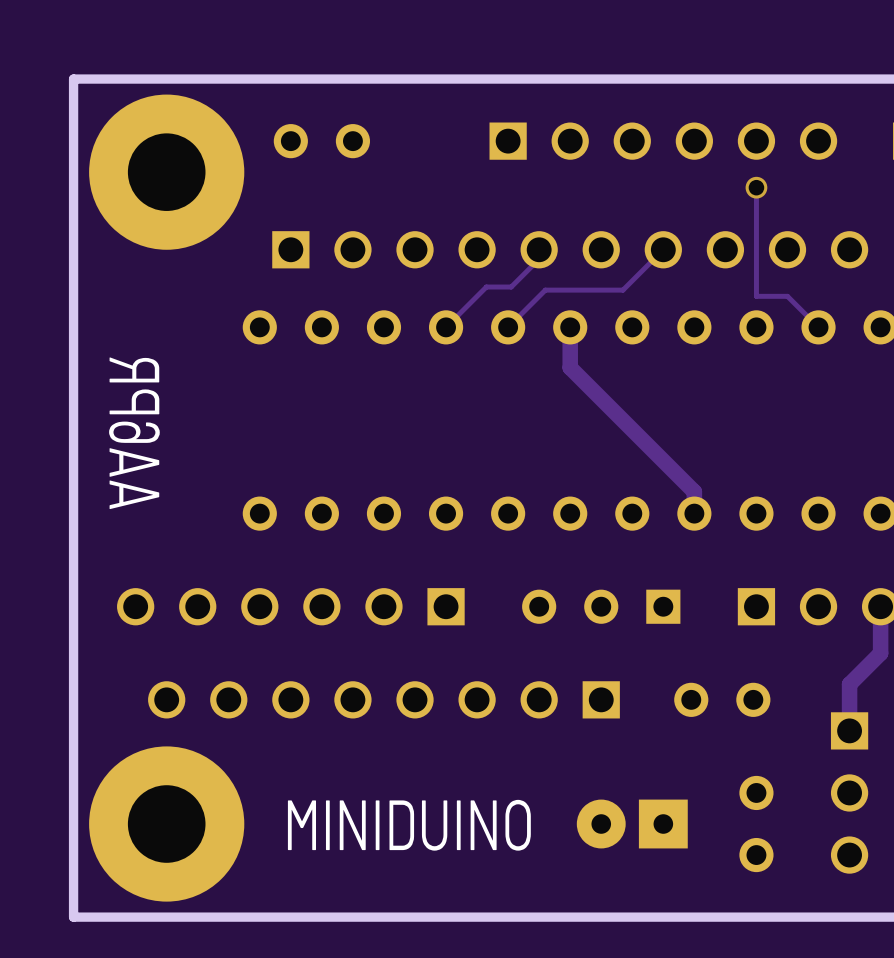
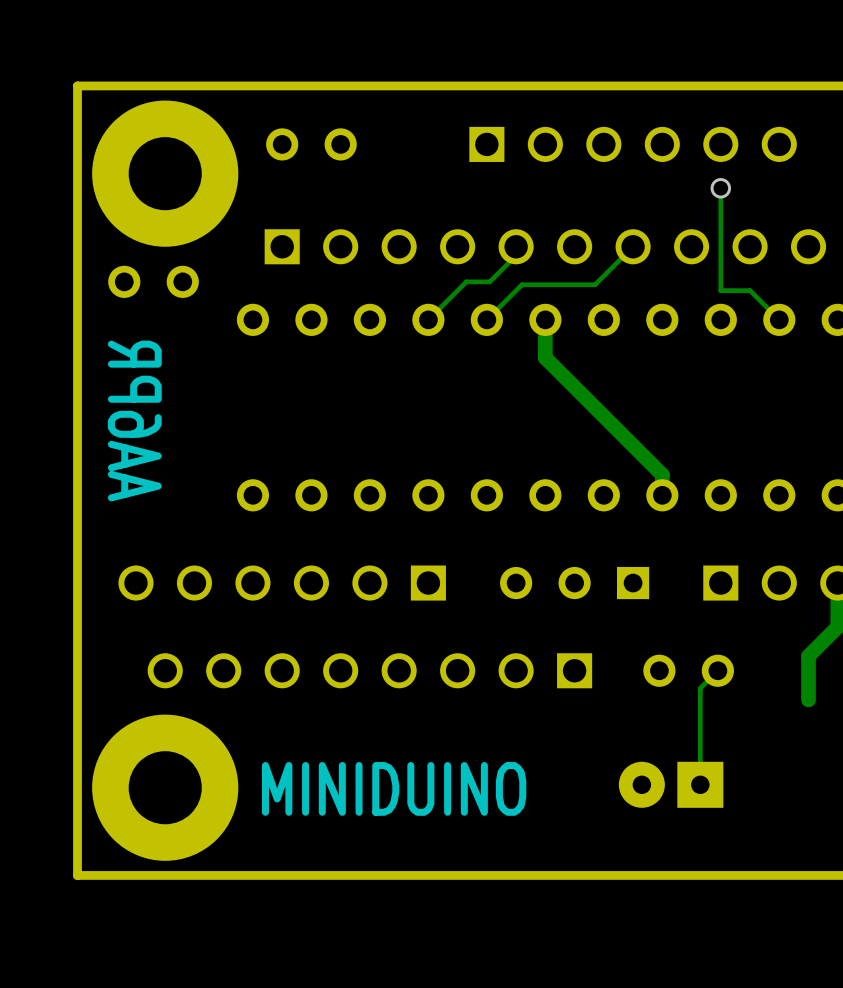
part: none -> (153, 281)
track: none -> (717, 670) (700, 688) (700, 784)
part: (849, 792) -> none
part position: (632, 824) -> (671, 784)
part: (756, 824) -> none

